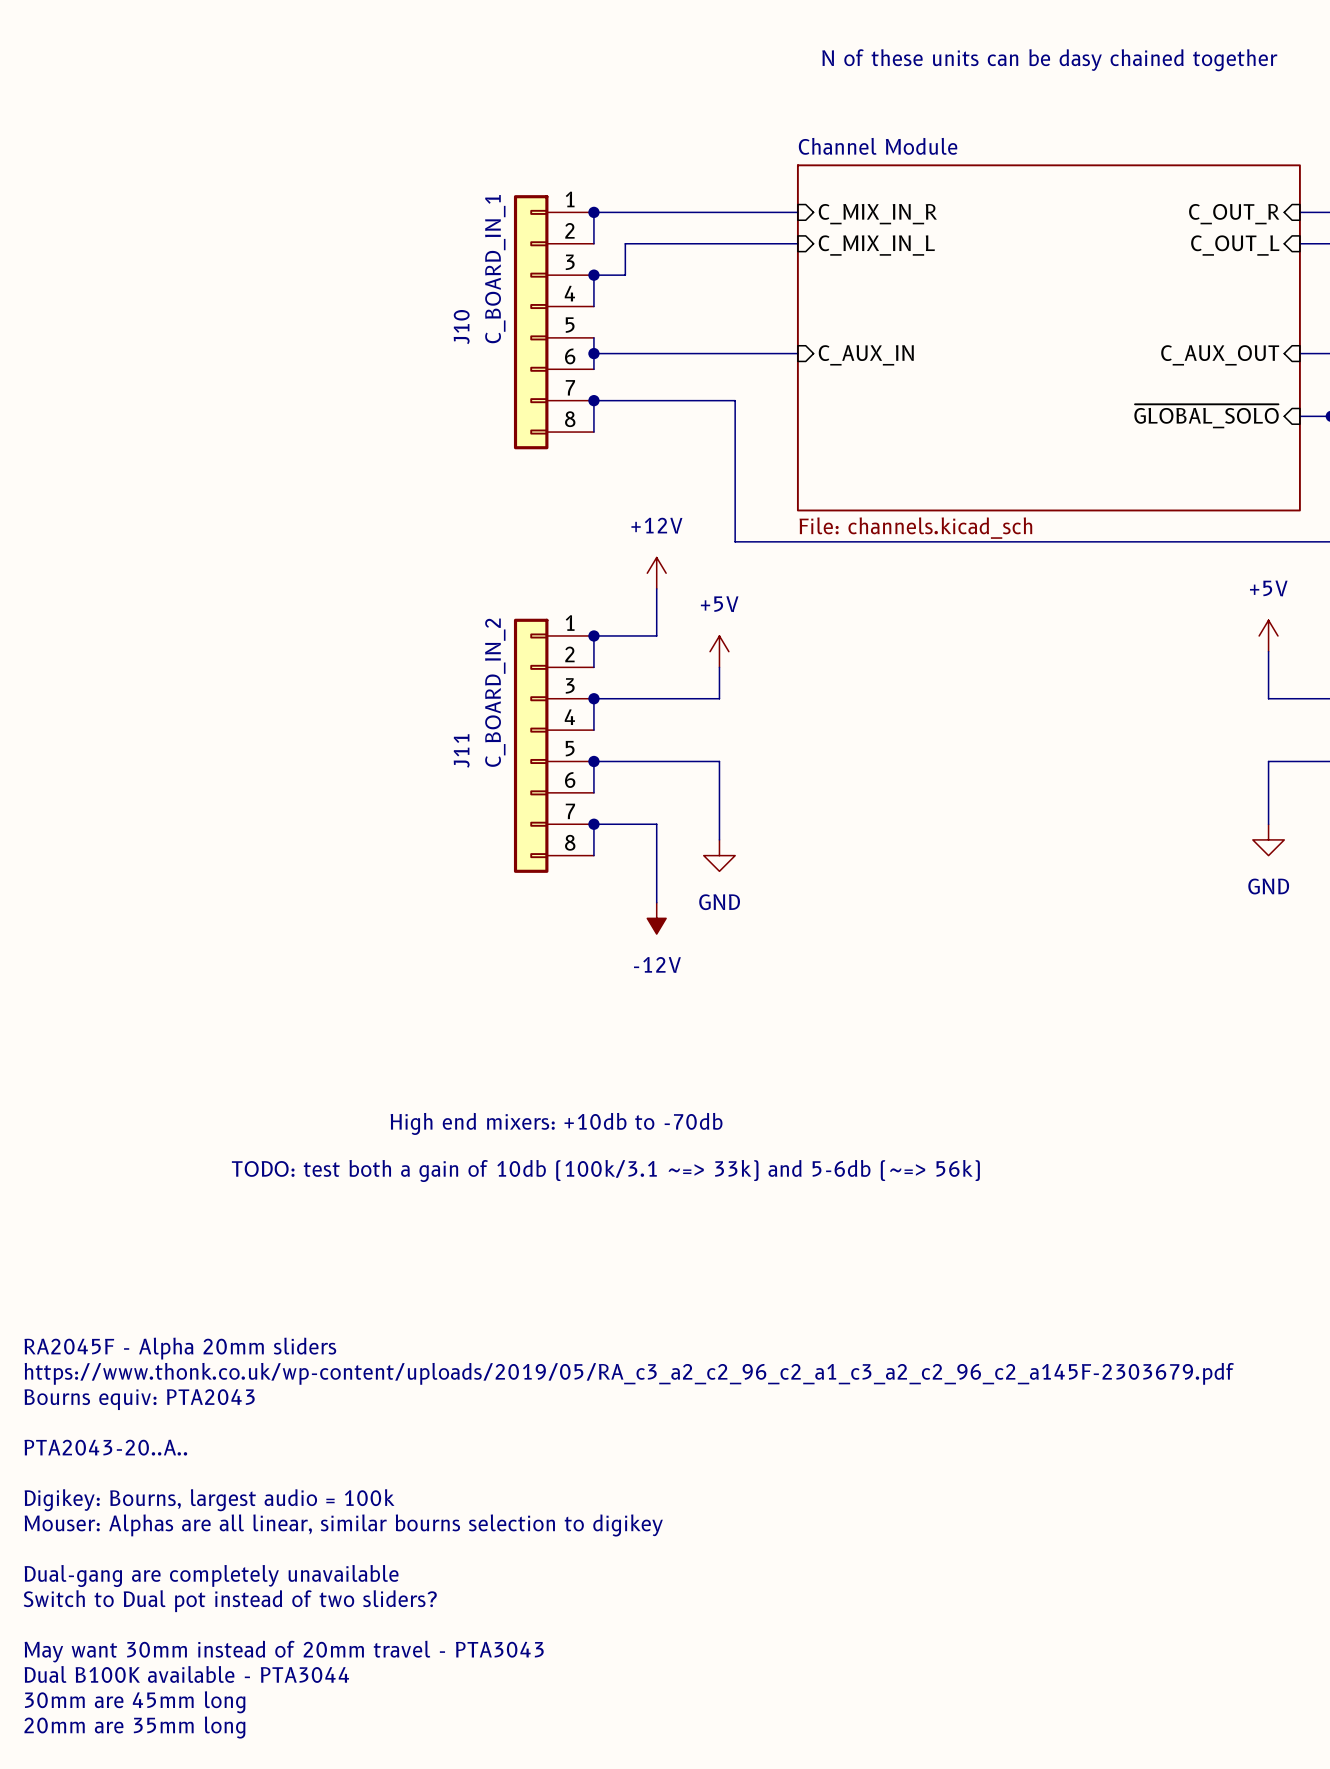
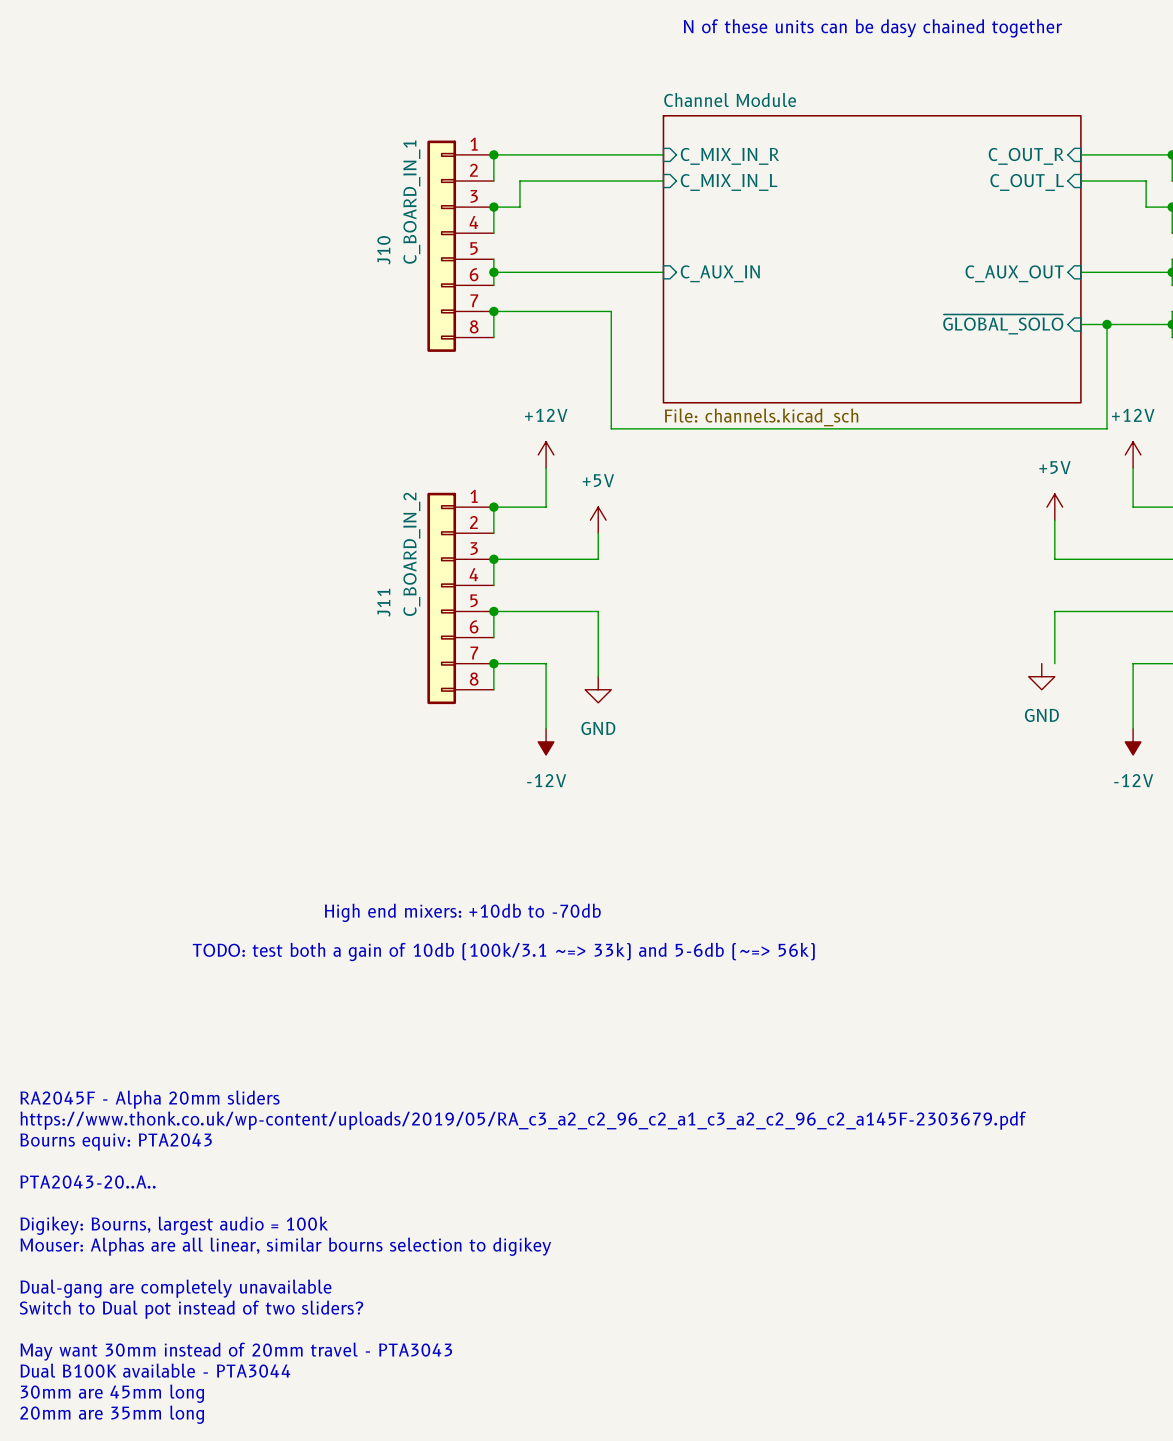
power symbol position: GND (1268, 839) -> GND (1041, 676)

